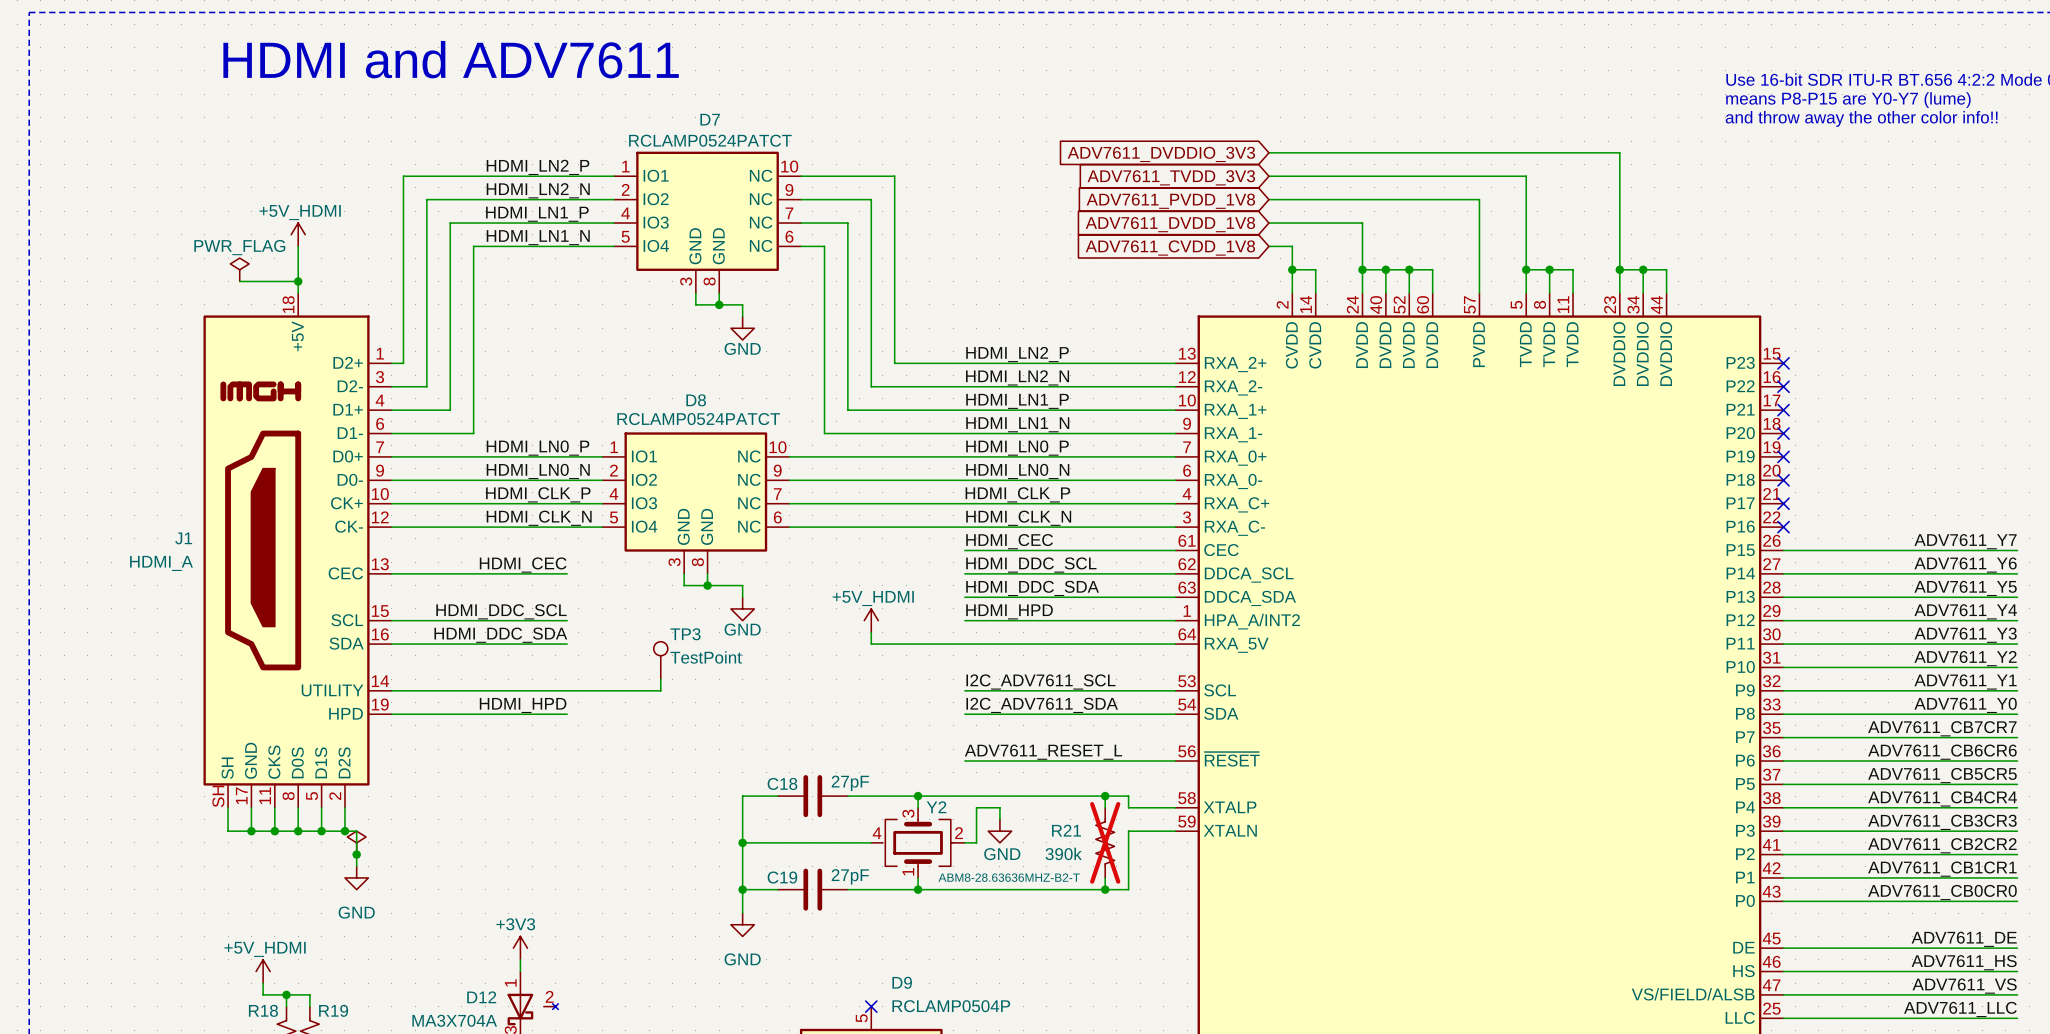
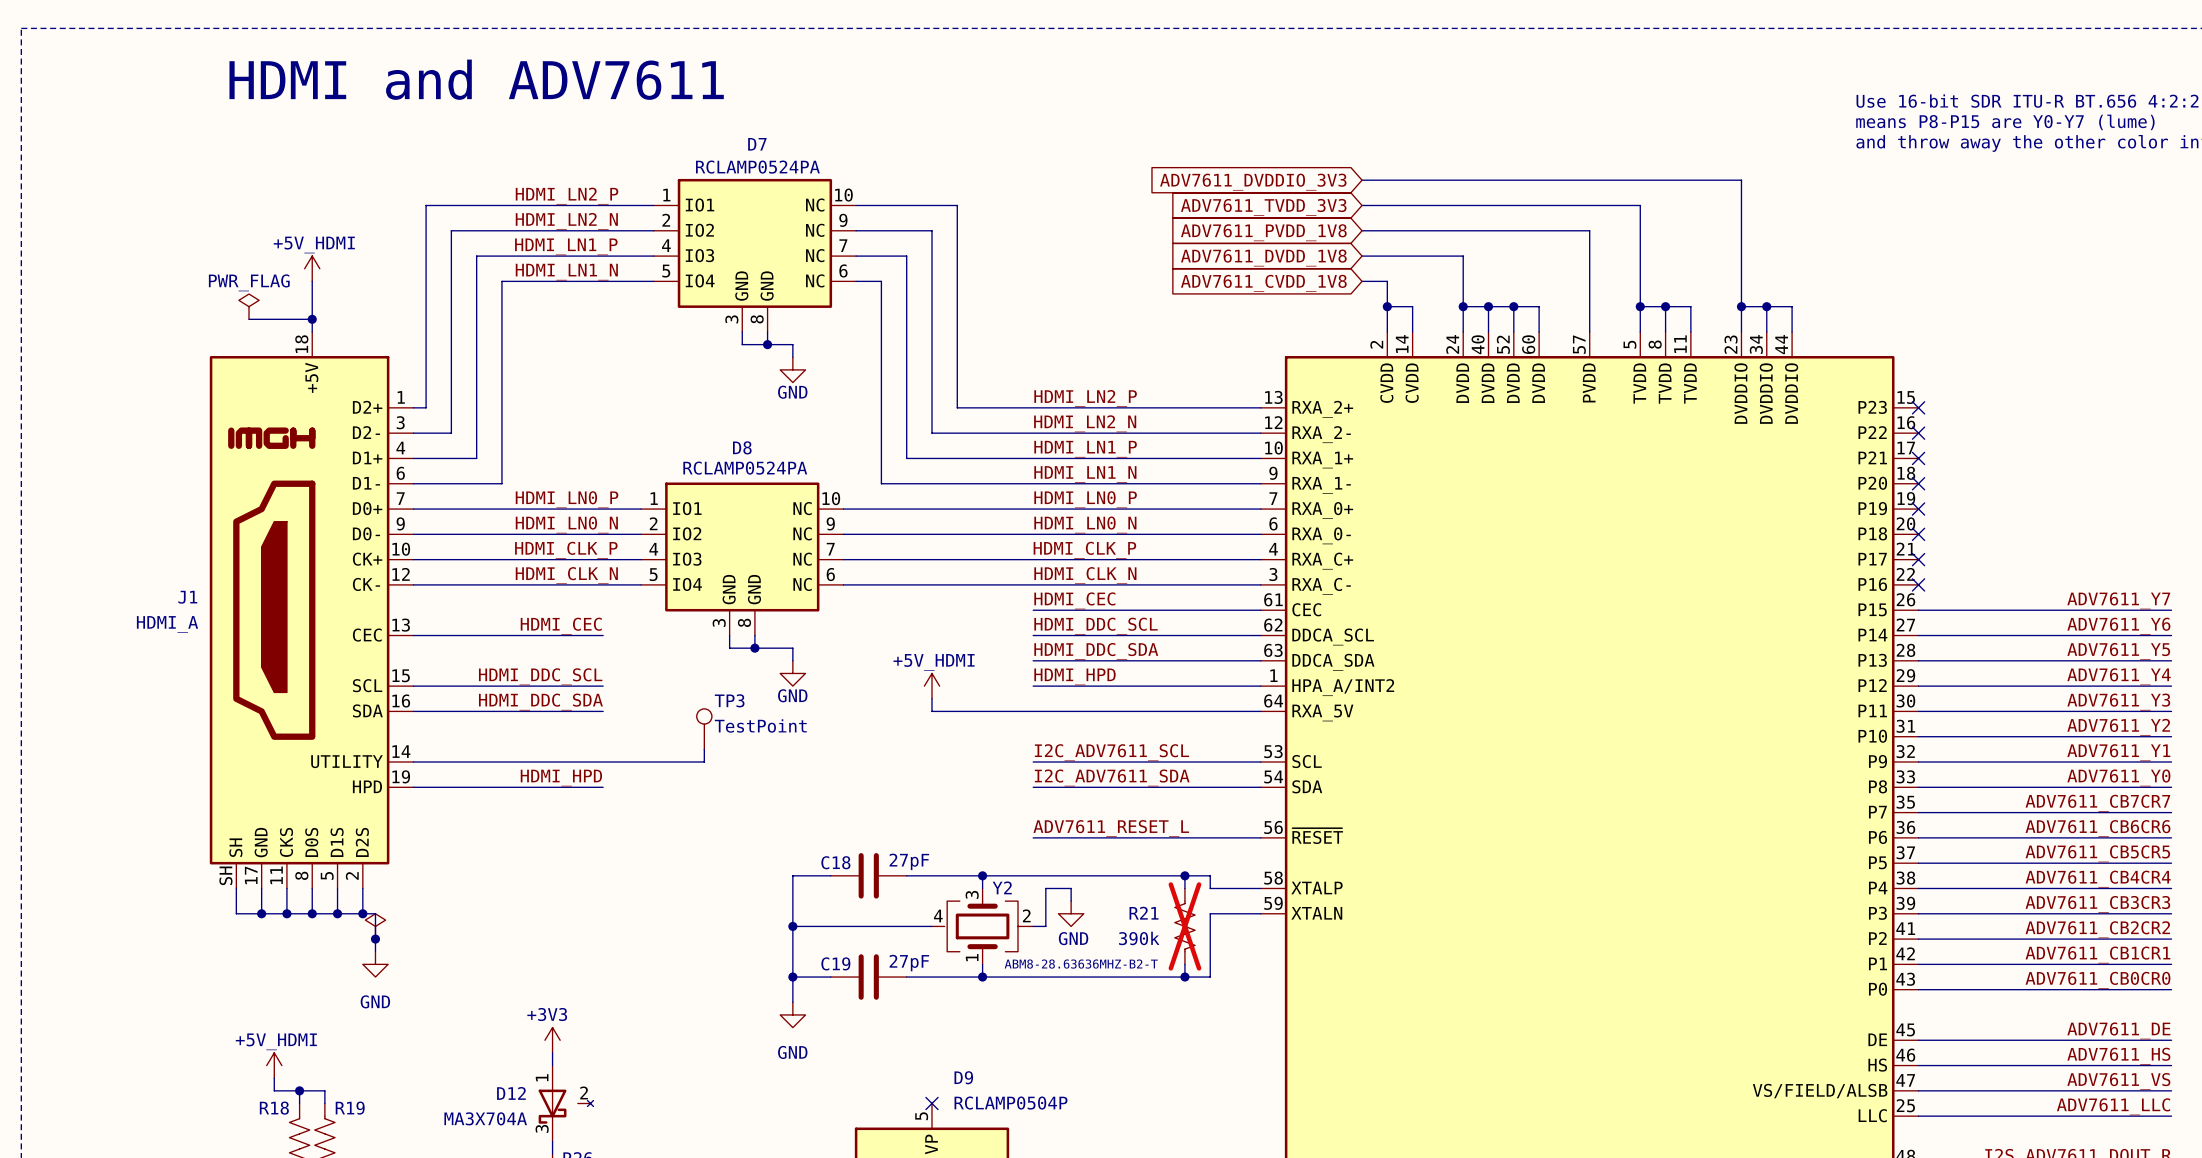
D7 value: RCLAMP0524PATCT (710, 140) -> RCLAMP0524PA (757, 167)
D8 value: RCLAMP0524PATCT (698, 419) -> RCLAMP0524PA (745, 468)

